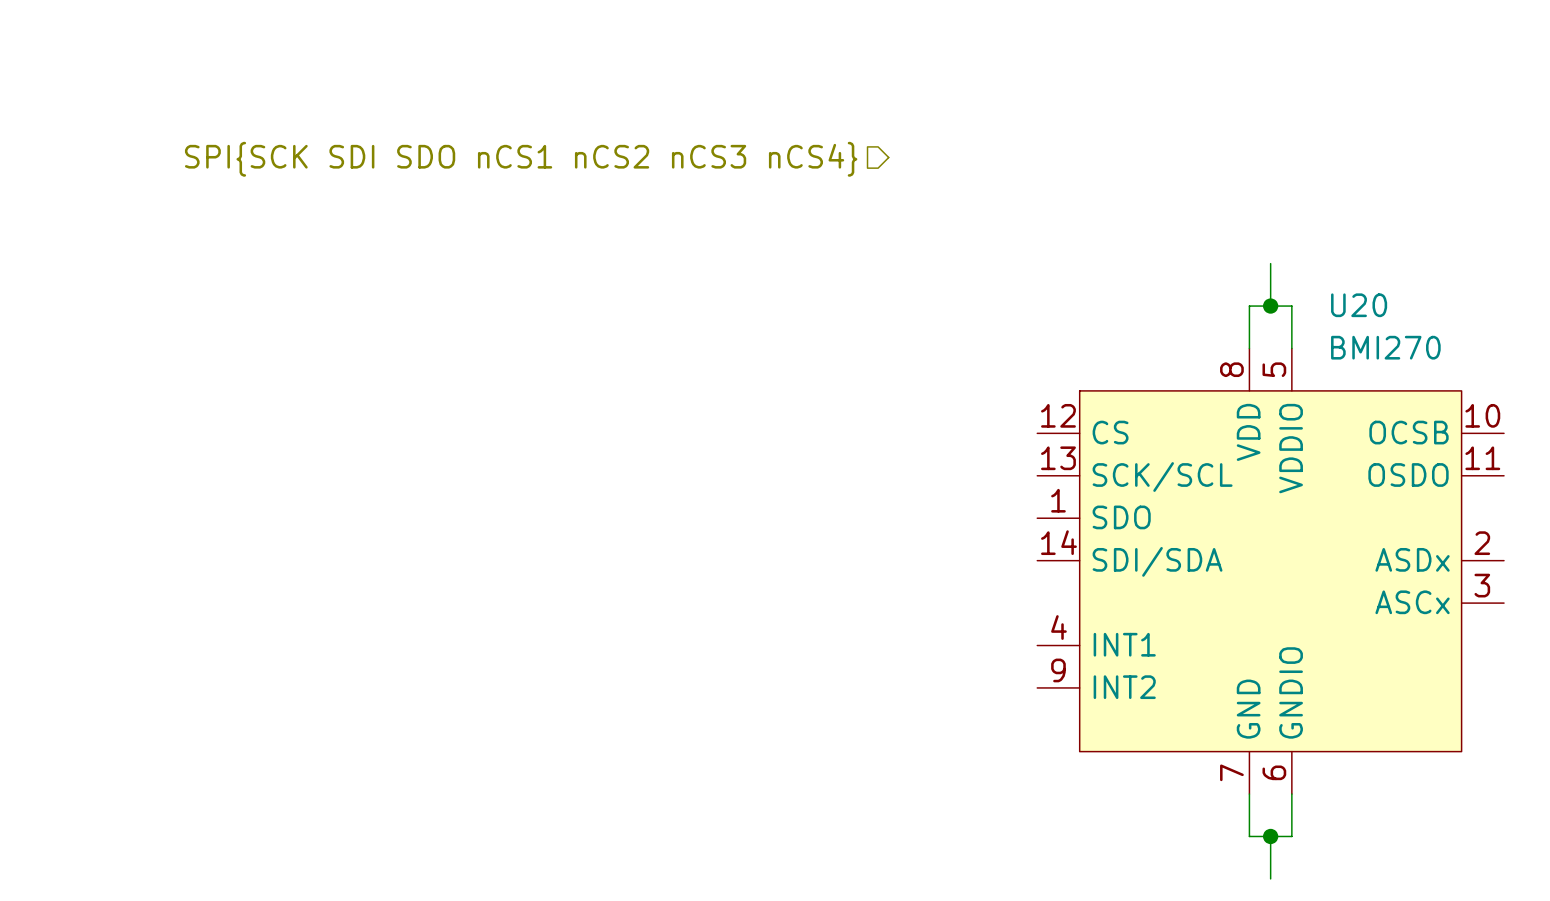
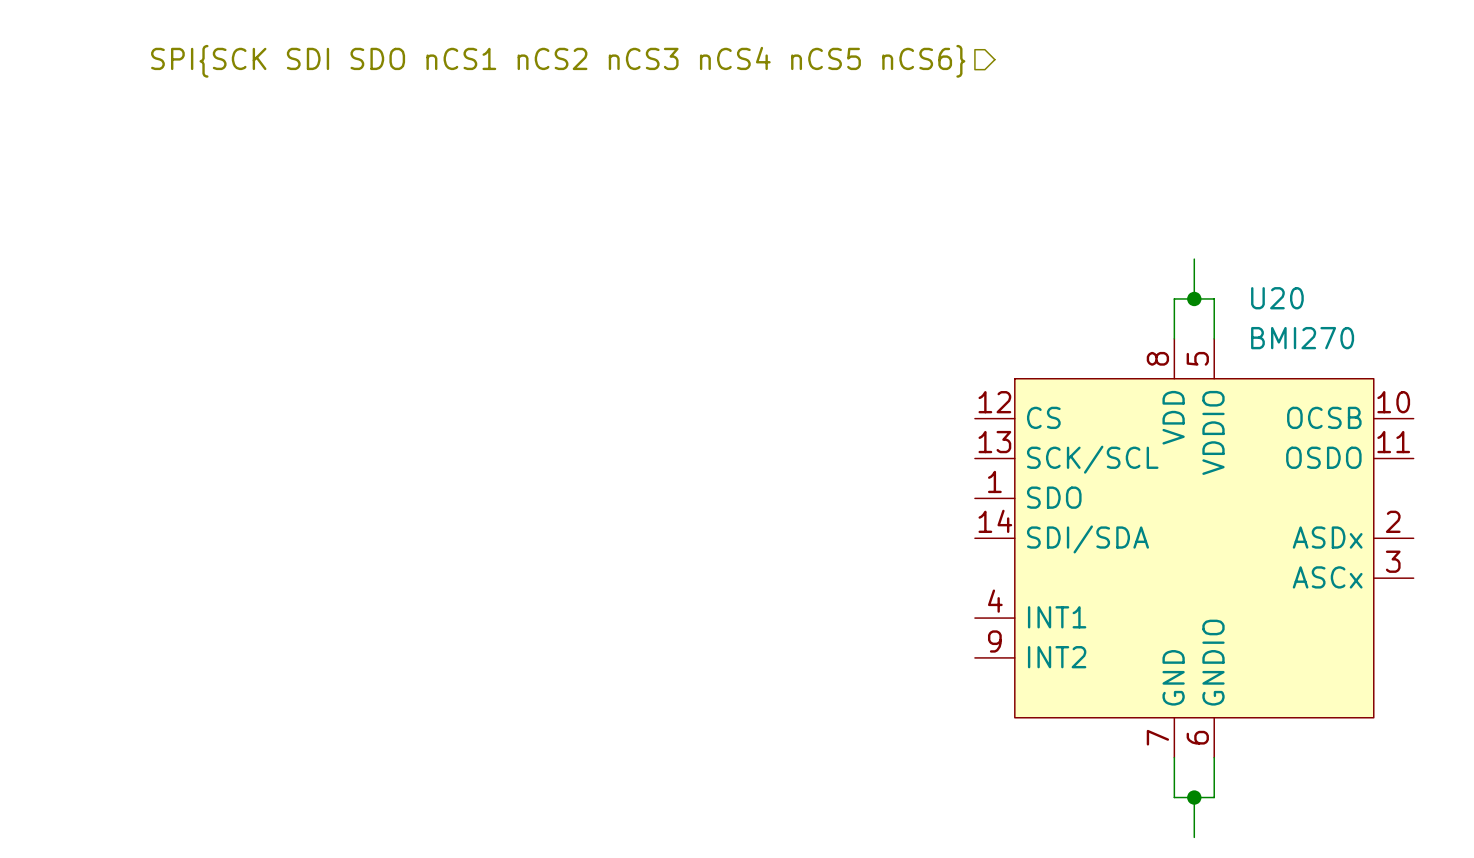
hierarchical label: none -> SPI{SCK SDI SDO nCS1 nCS2 nCS3 nCS4 nCS5 nCS6} (558, 61)
hierarchical label: SPI{SCK SDI SDO nCS1 nCS2 nCS3 nCS4} (521, 159) -> none

